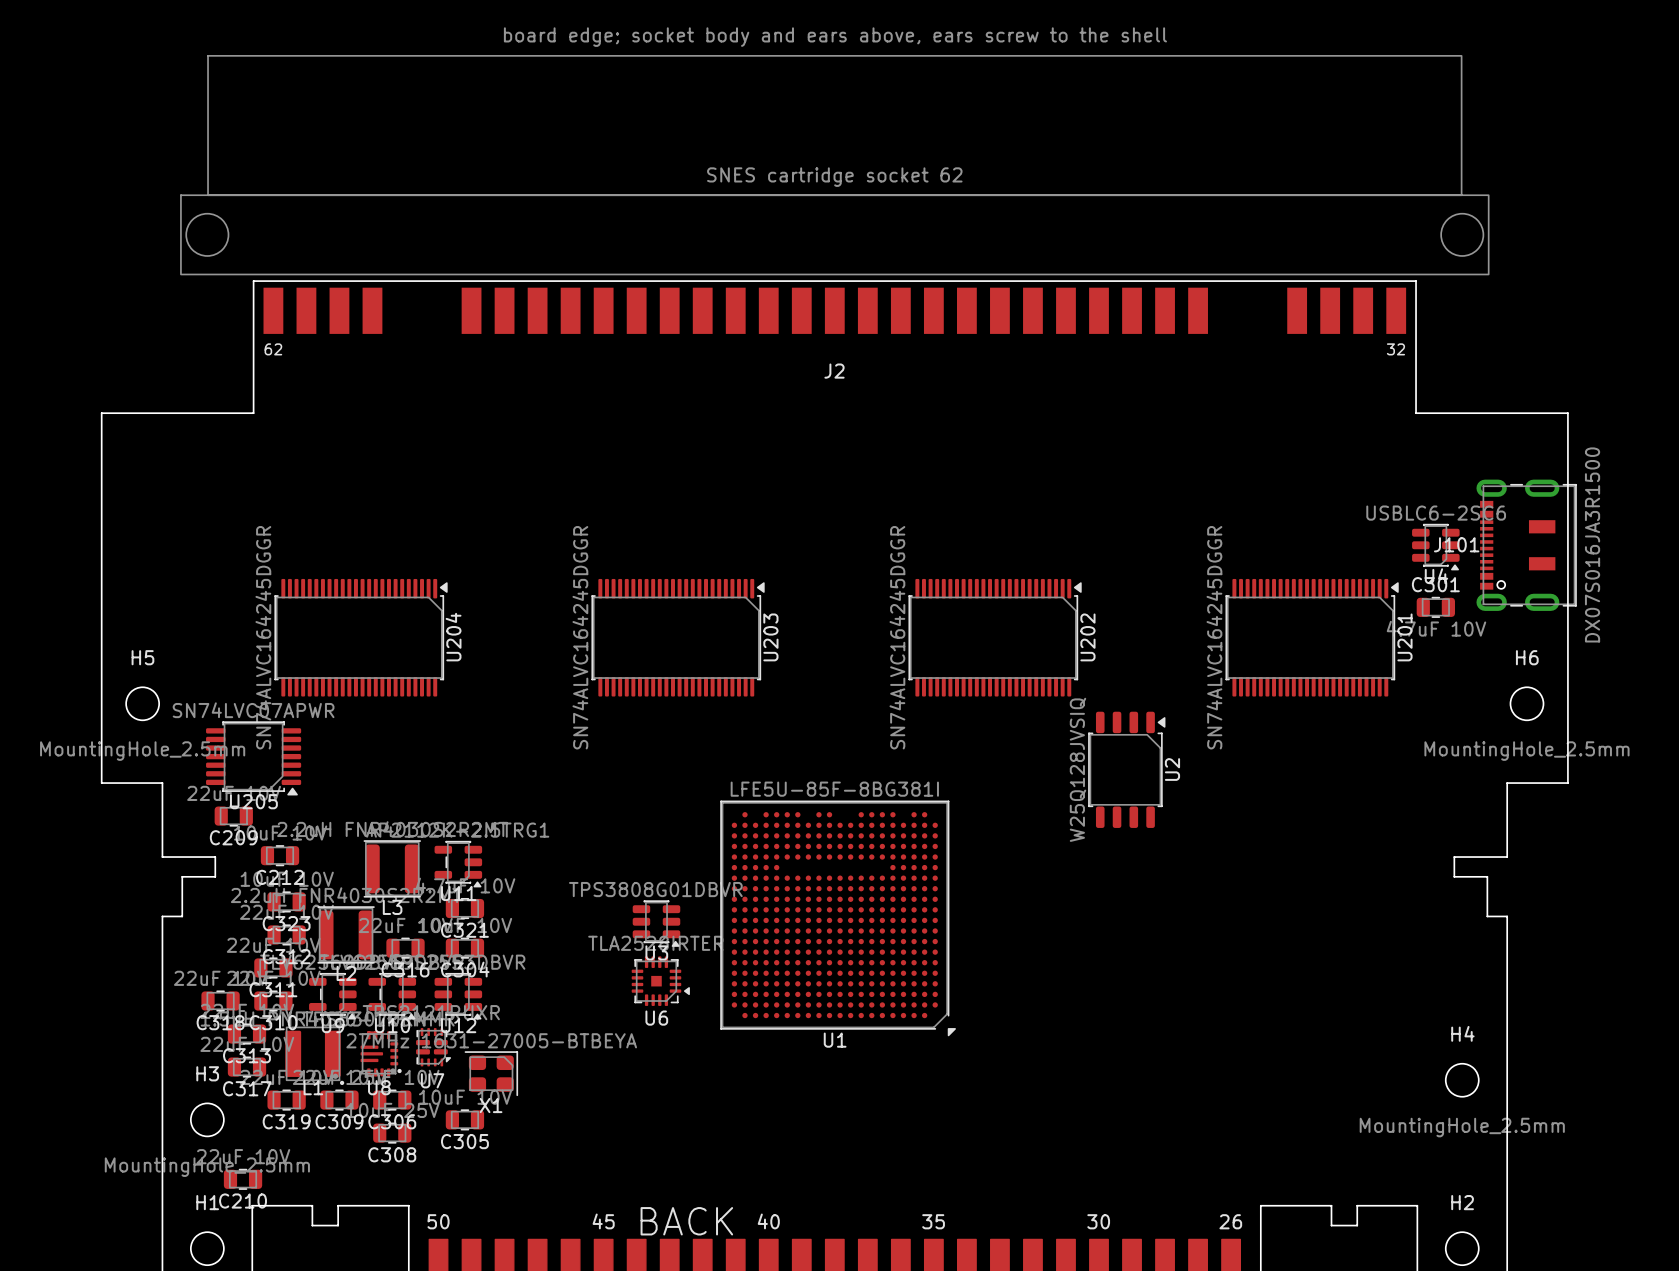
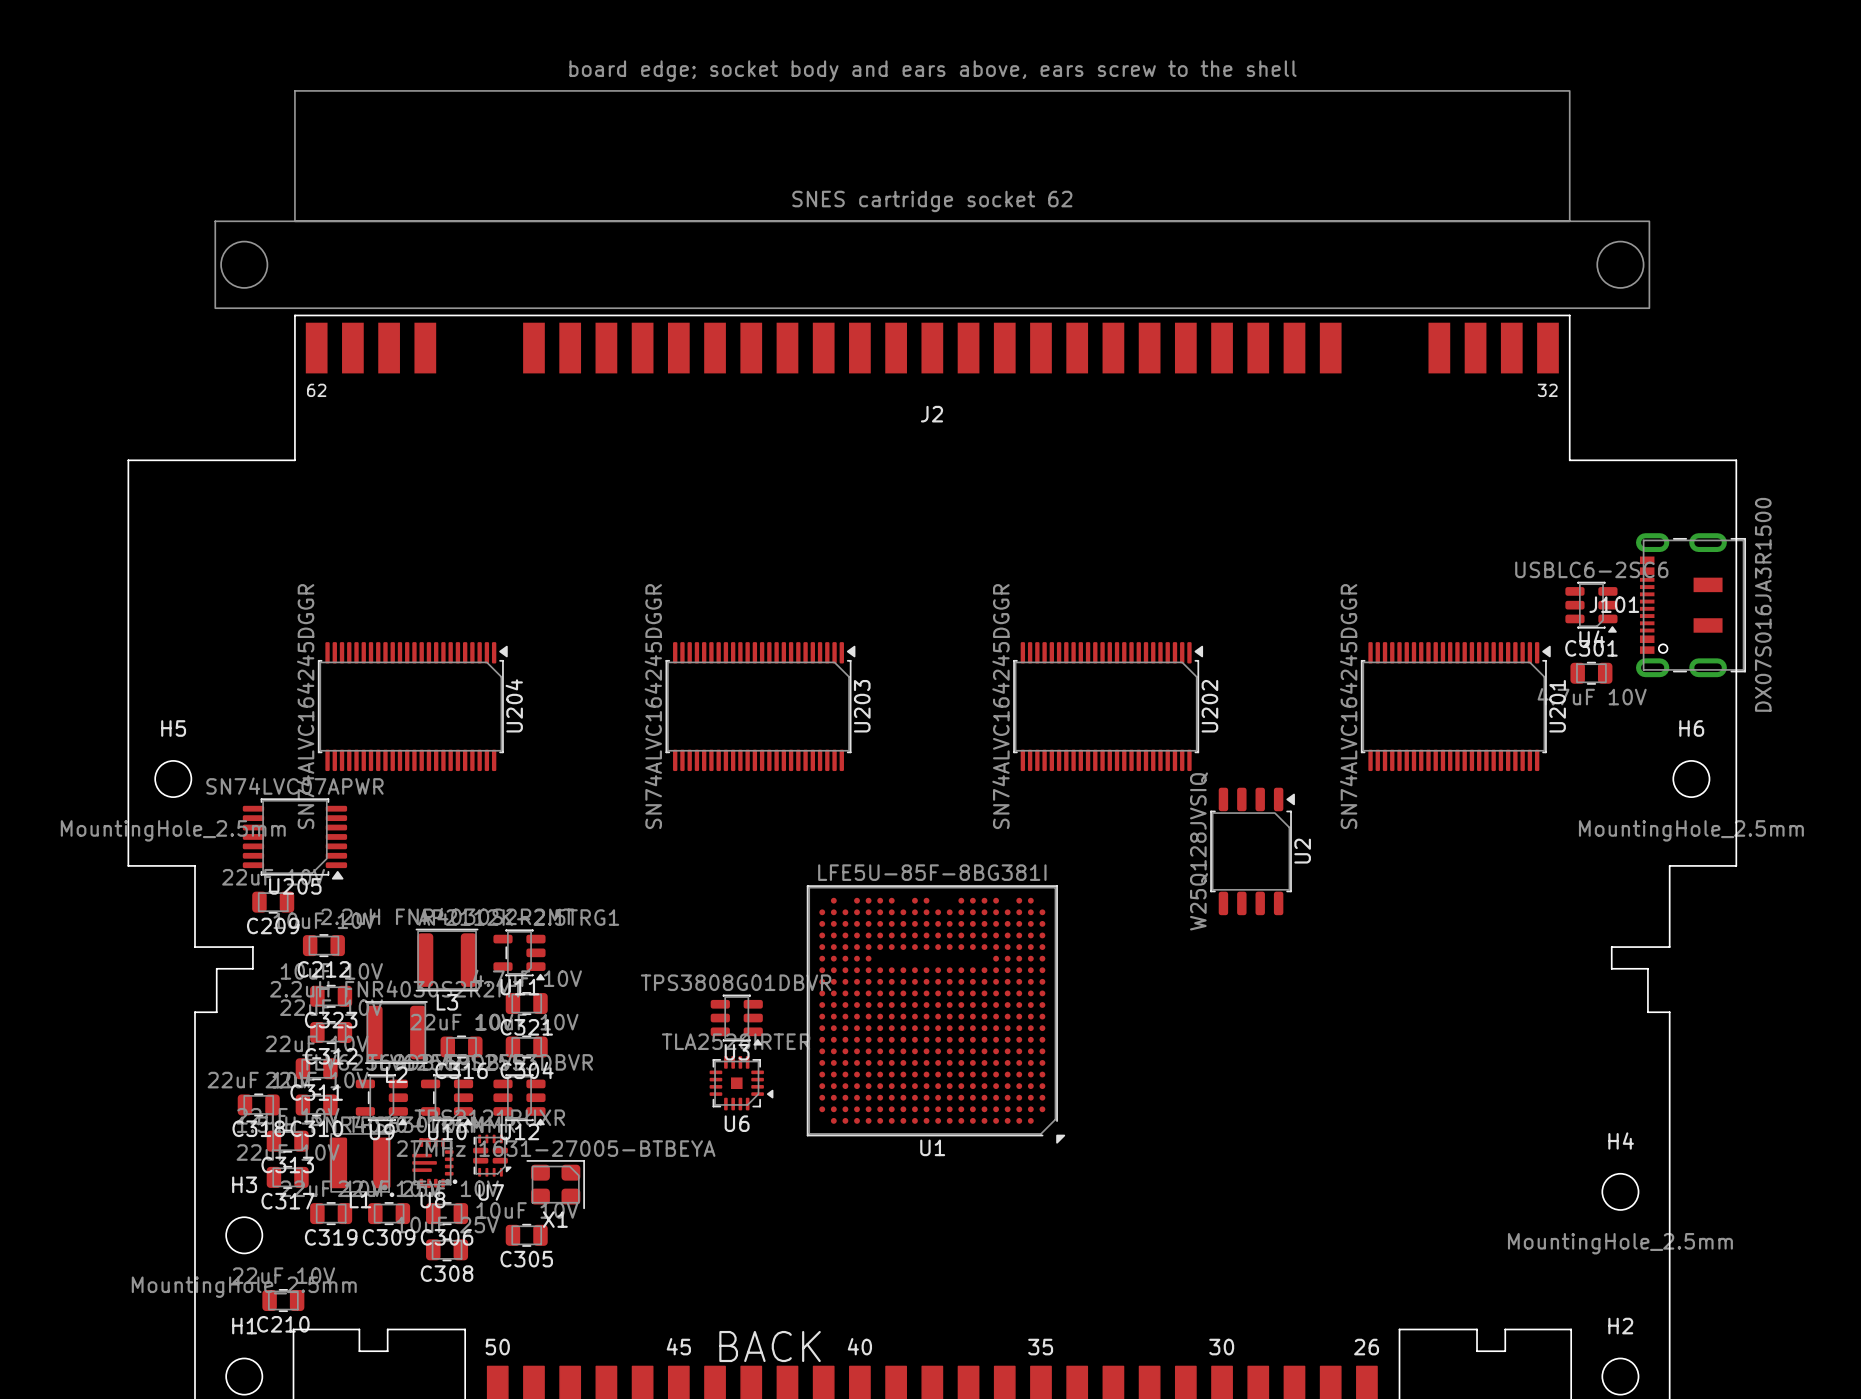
J2 footprint: [180, 55, 1490, 334] -> [214, 90, 1651, 374]

